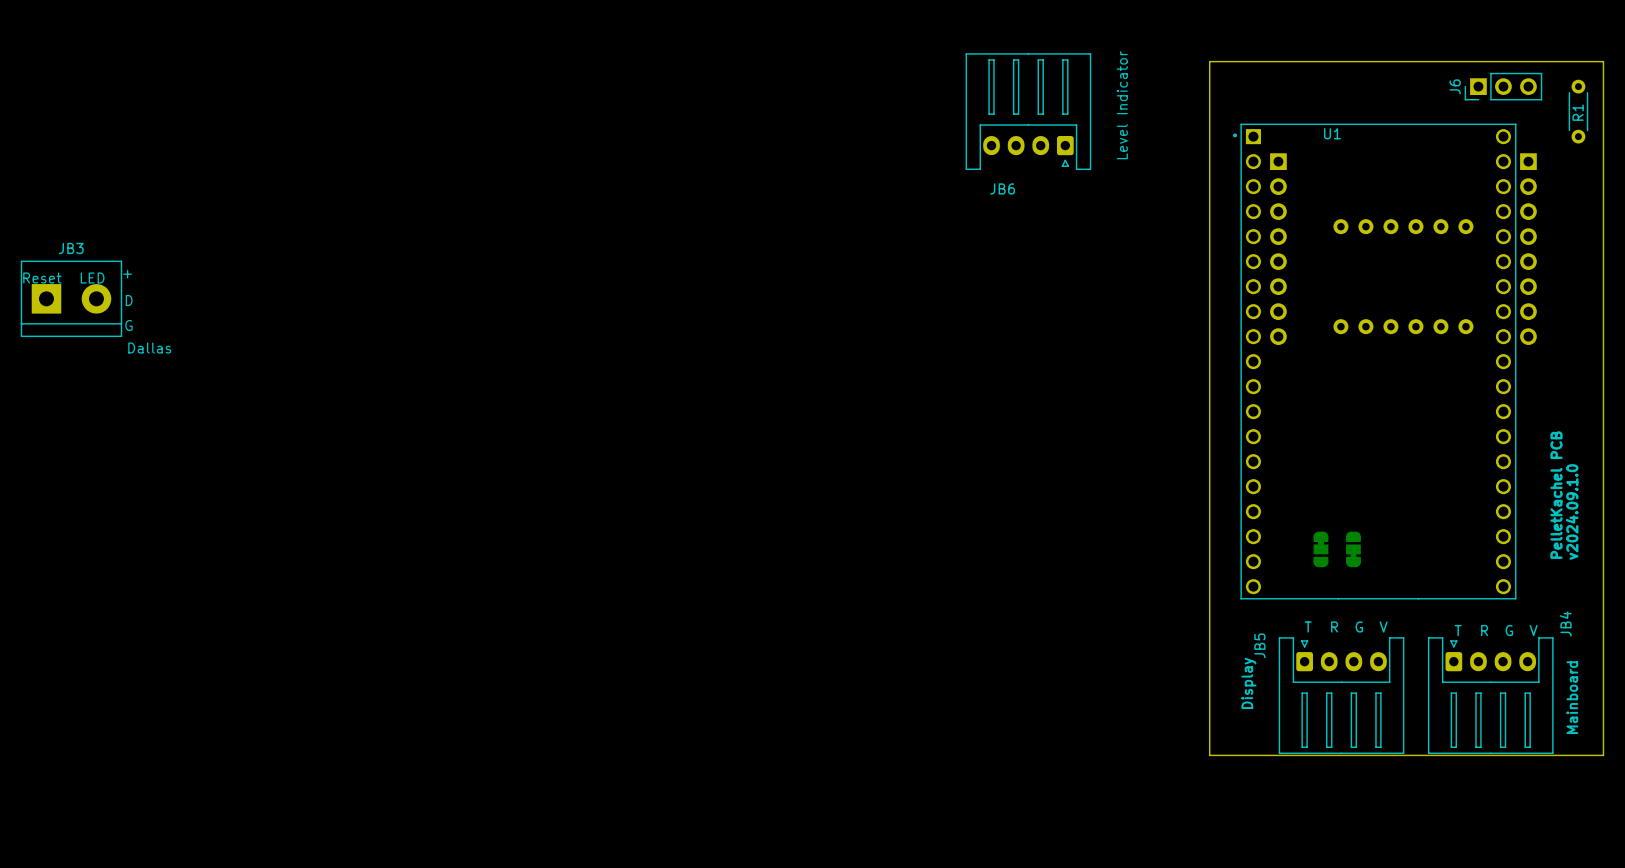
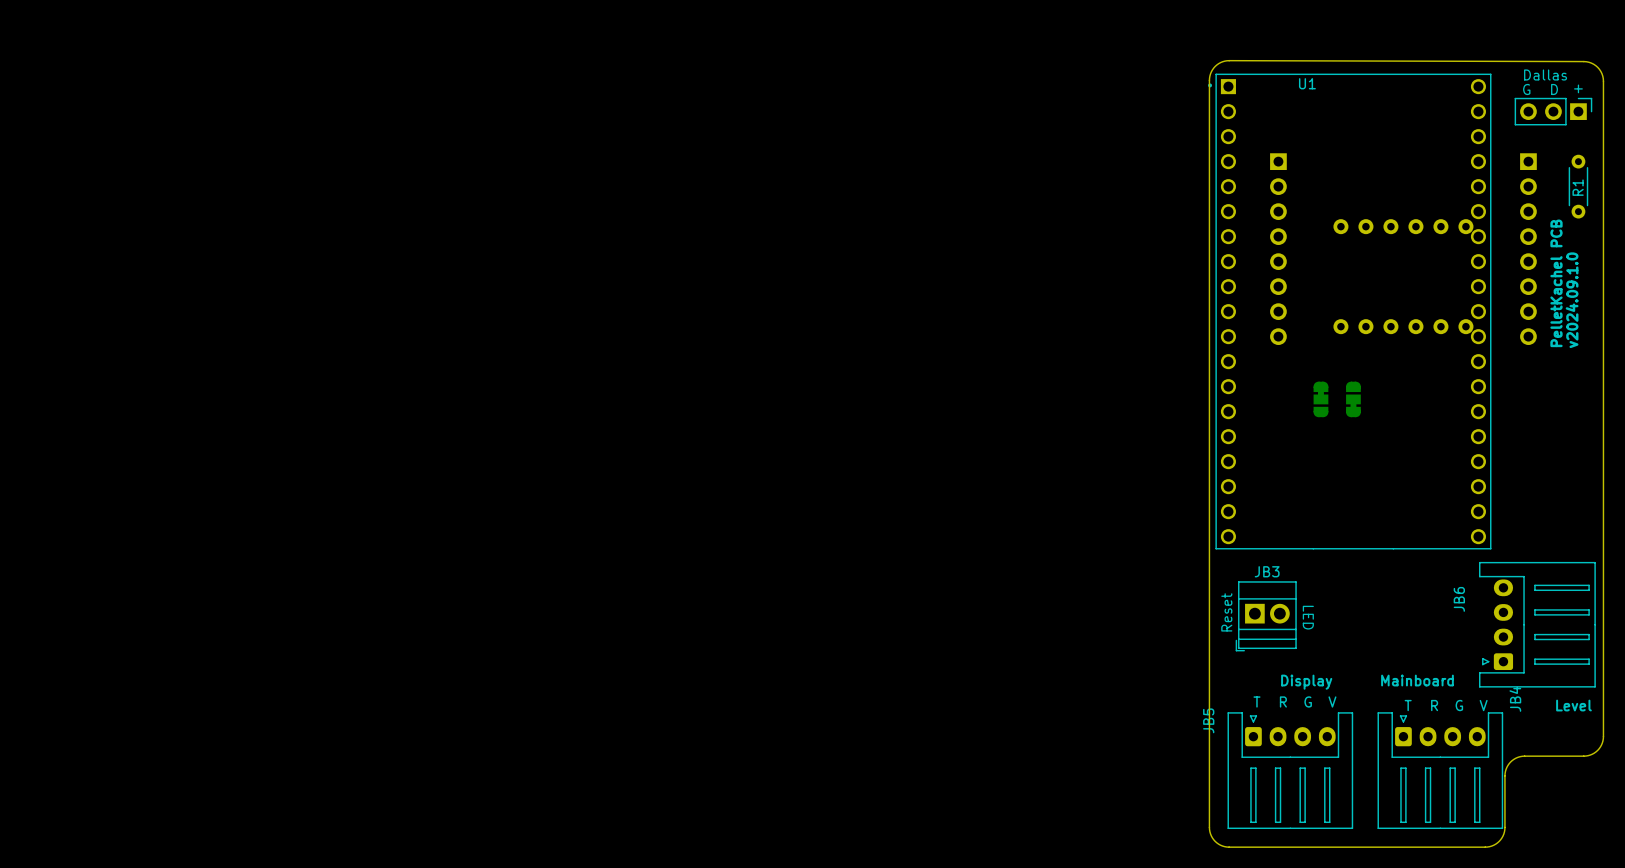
text: none -> Dallas (1545, 74)
board edge: (1603, 81) (1603, 61) (1209, 61) (1209, 755) (1603, 755) (1603, 736) -> (1603, 81) (1597, 67) (1583, 61) (1229, 60) (1218, 63) (1211, 71) (1209, 80) (1209, 831) (1216, 842) (1229, 847) (1489, 846) (1499, 841) (1504, 831) (1505, 773) (1510, 761) (1522, 756) (1588, 755) (1599, 748) (1603, 736)
J6: (1503, 86) -> none
text: none -> + (1578, 88)
text: none -> G (1526, 89)
text: none -> D (1554, 89)
text: Level Indicator (1122, 105) -> none
JB6 rotation: 0° (1028, 111) -> 90° clockwise (1537, 624)
JB6 position: (1028, 111) -> (1537, 624)
part: none -> (1553, 111)
R1 position: (1578, 111) -> (1578, 186)
JB3 footprint: [20, 260, 123, 337] -> [1235, 581, 1297, 652]
text: + (127, 274) -> none
text: Reset (42, 278) -> none
text: LED (92, 278) -> none
text: D (129, 300) -> none
text: G (128, 325) -> none
text: Dallas (149, 348) -> none
U1 position: (1374, 361) -> (1349, 311)
part: none -> (1320, 399)
part: none -> (1353, 399)
text position: PelletKachel PCB (1556, 495) -> PelletKachel PCB (1556, 283)
text position: v2024.09.1.0 (1572, 511) -> v2024.09.1.0 (1572, 300)
part: (1320, 549) -> none
part: (1353, 549) -> none
text: none -> Reset (1226, 612)
text: none -> LED (1308, 617)
text: T (1308, 626) -> none
text: R (1334, 626) -> none
text: G (1359, 626) -> none
text: V (1383, 626) -> none
text: T (1458, 630) -> none
text: R (1484, 630) -> none
text: G (1509, 630) -> none
text: V (1533, 630) -> none
text rotation: 0° (1248, 683) -> 90° clockwise (1306, 682)
JB5 position: (1341, 695) -> (1290, 770)
JB4 position: (1490, 695) -> (1440, 770)
text rotation: 0° (1572, 697) -> 90° clockwise (1417, 680)
text position: Mainboard (1572, 697) -> Mainboard (1417, 680)
text: none -> T (1256, 701)
text: none -> R (1283, 701)
text: none -> G (1308, 701)
text: none -> V (1332, 701)
text: none -> T (1408, 705)
text: none -> R (1434, 705)
text: none -> G (1459, 705)
text: none -> V (1483, 705)
text: none -> Level (1573, 705)

